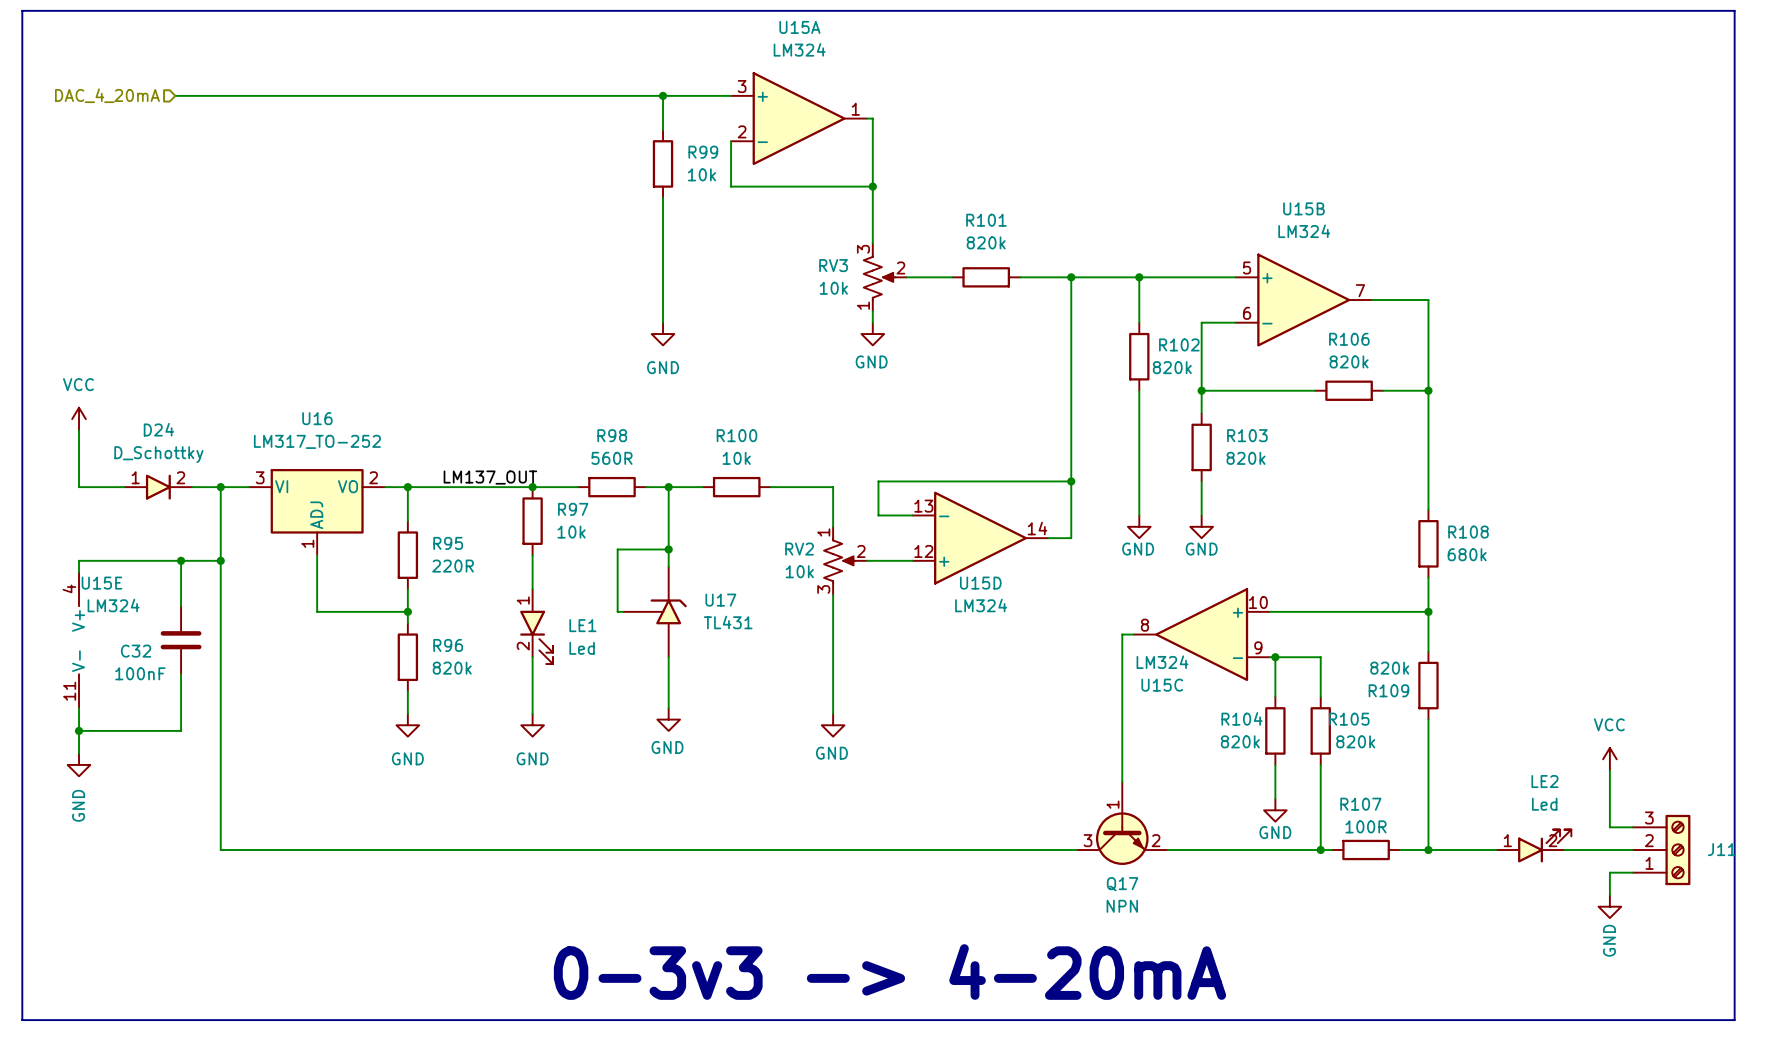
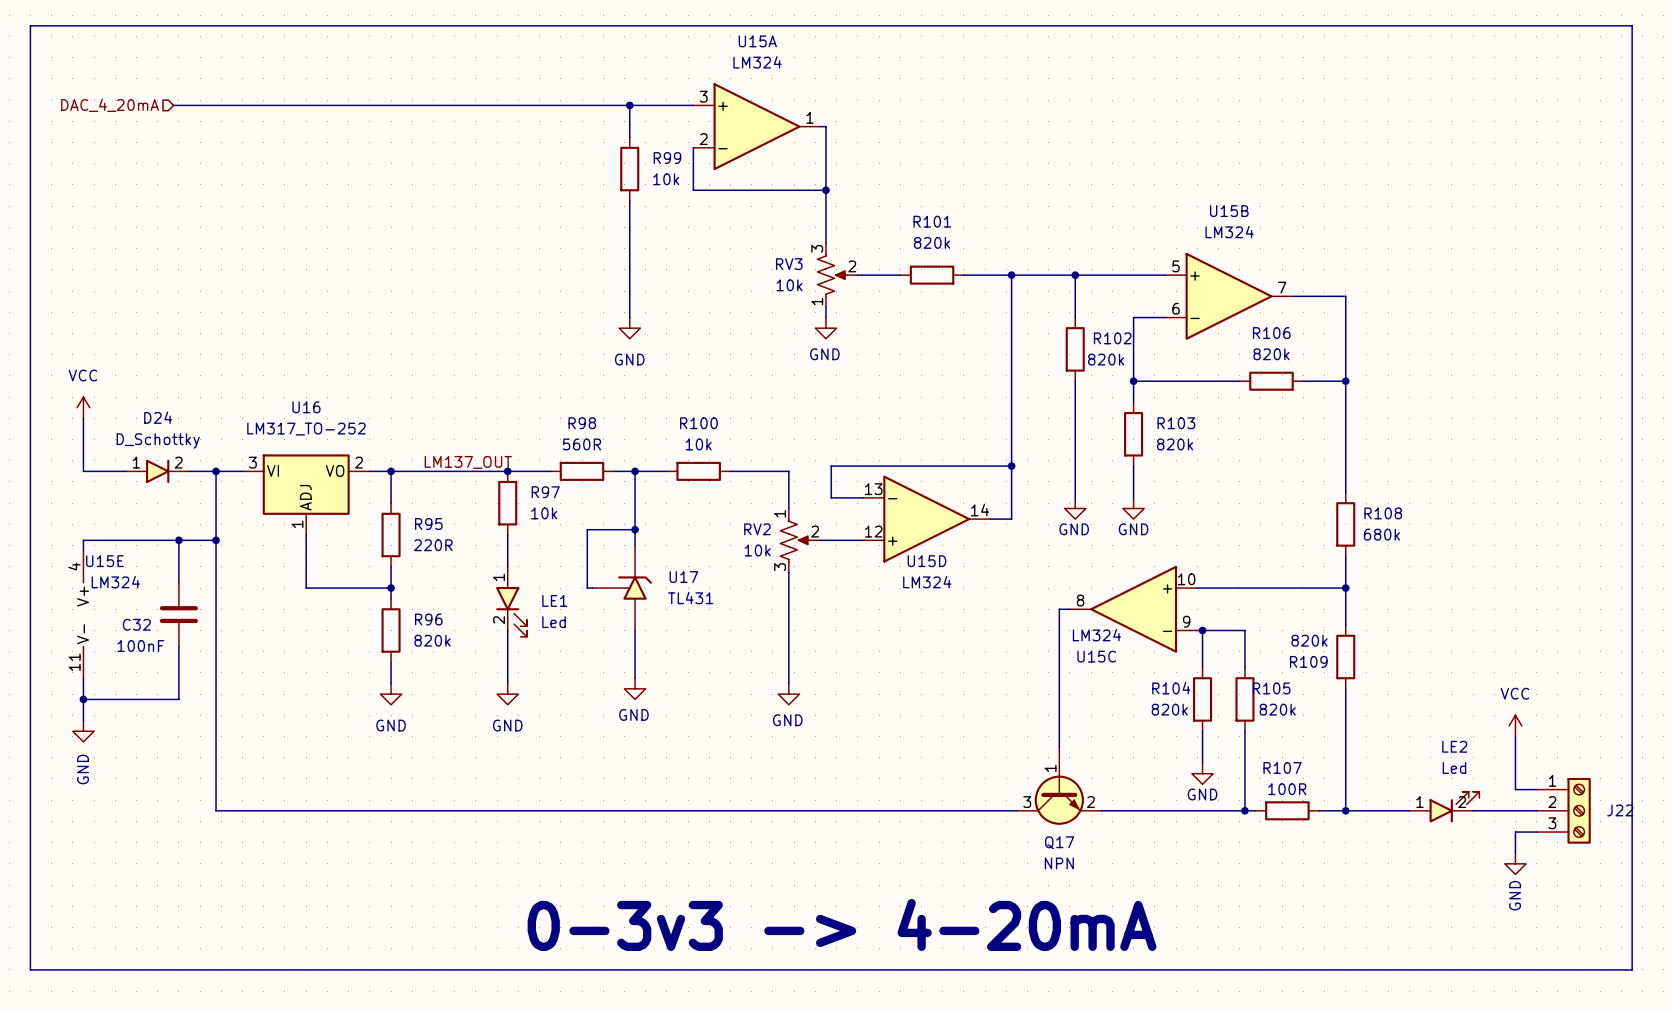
J11: (1661, 850) -> none
J22: none -> (1563, 810)

